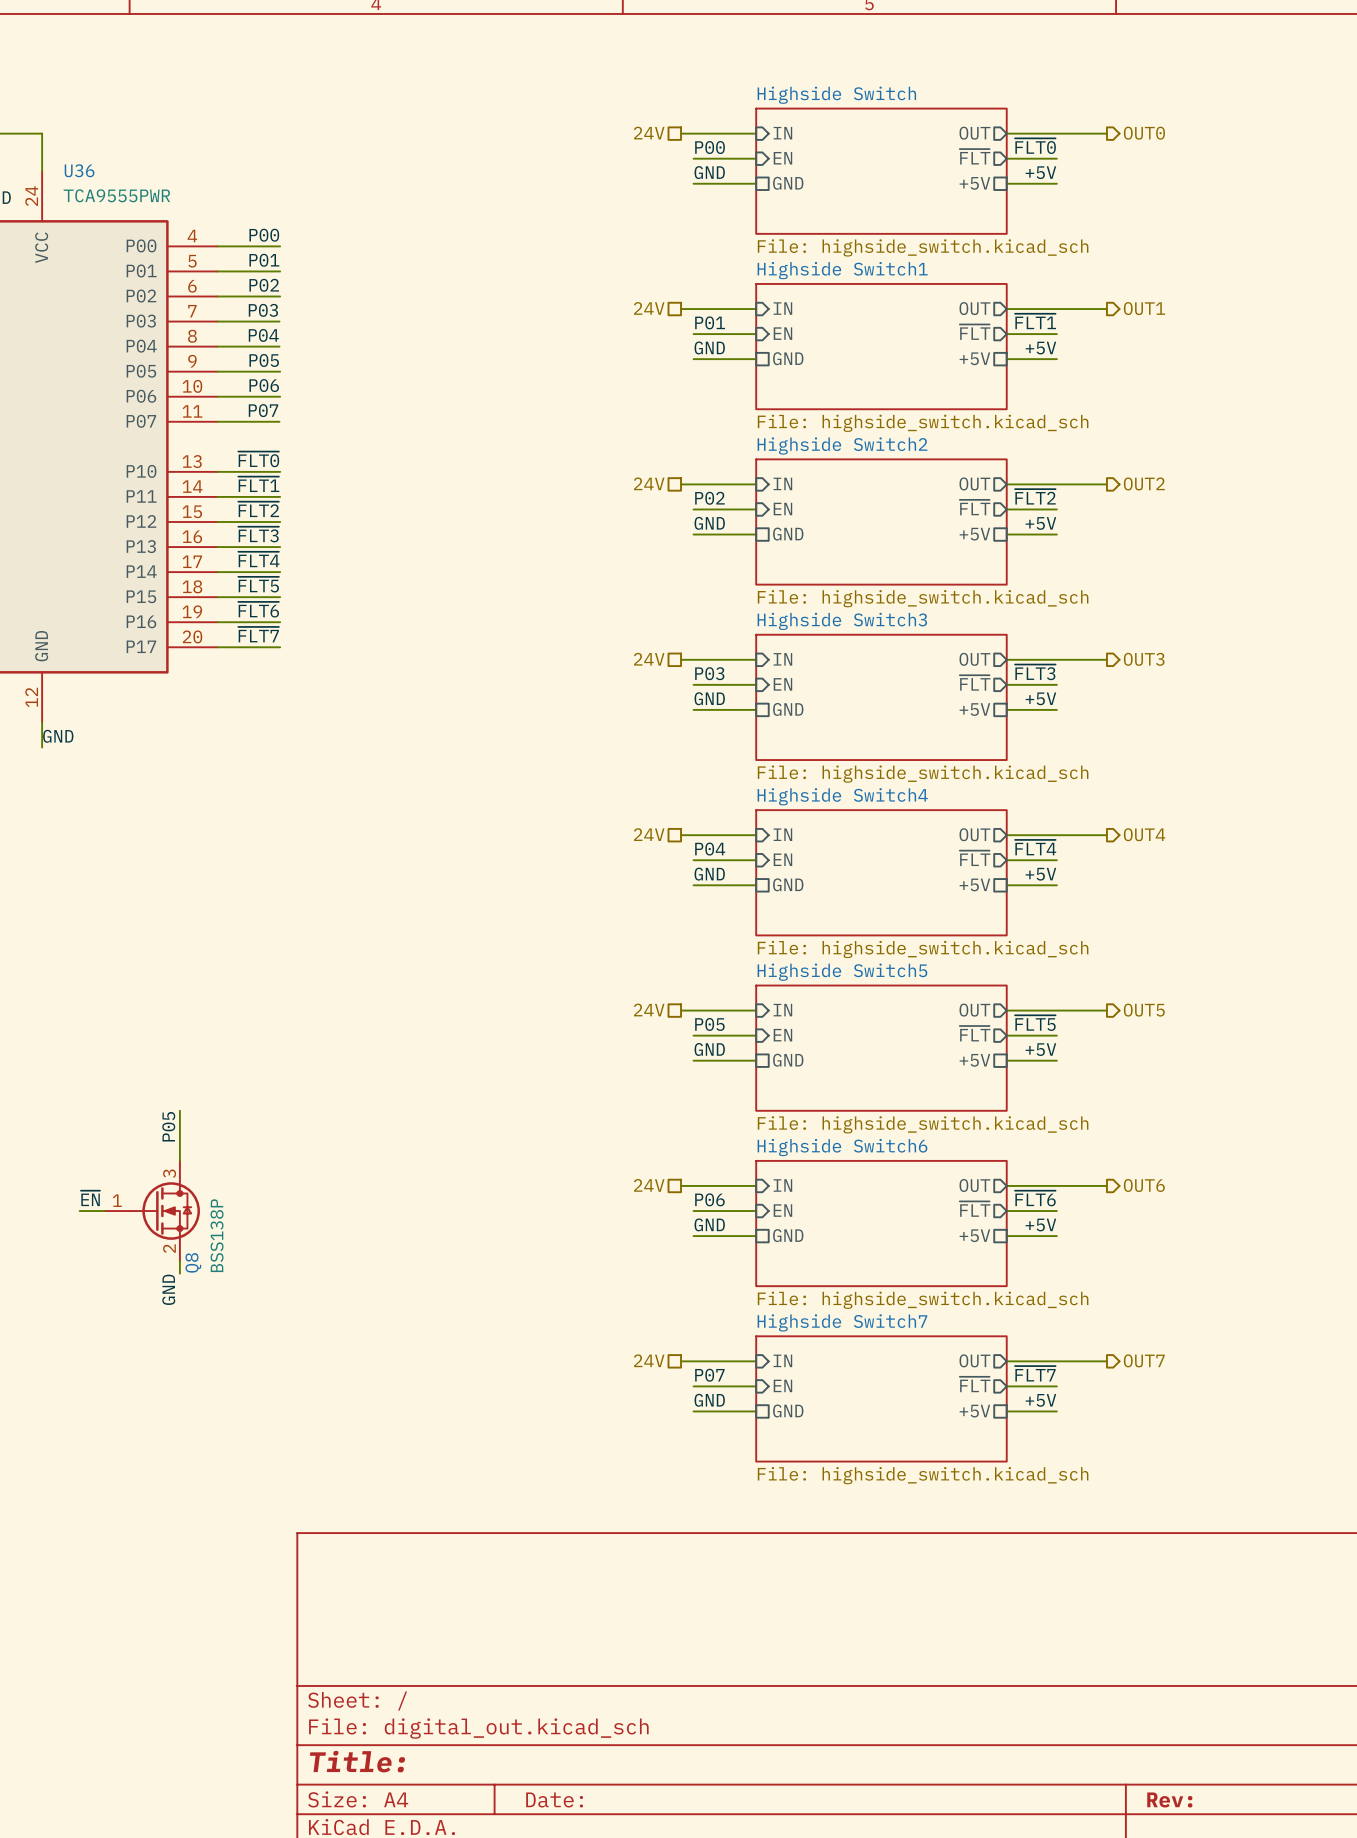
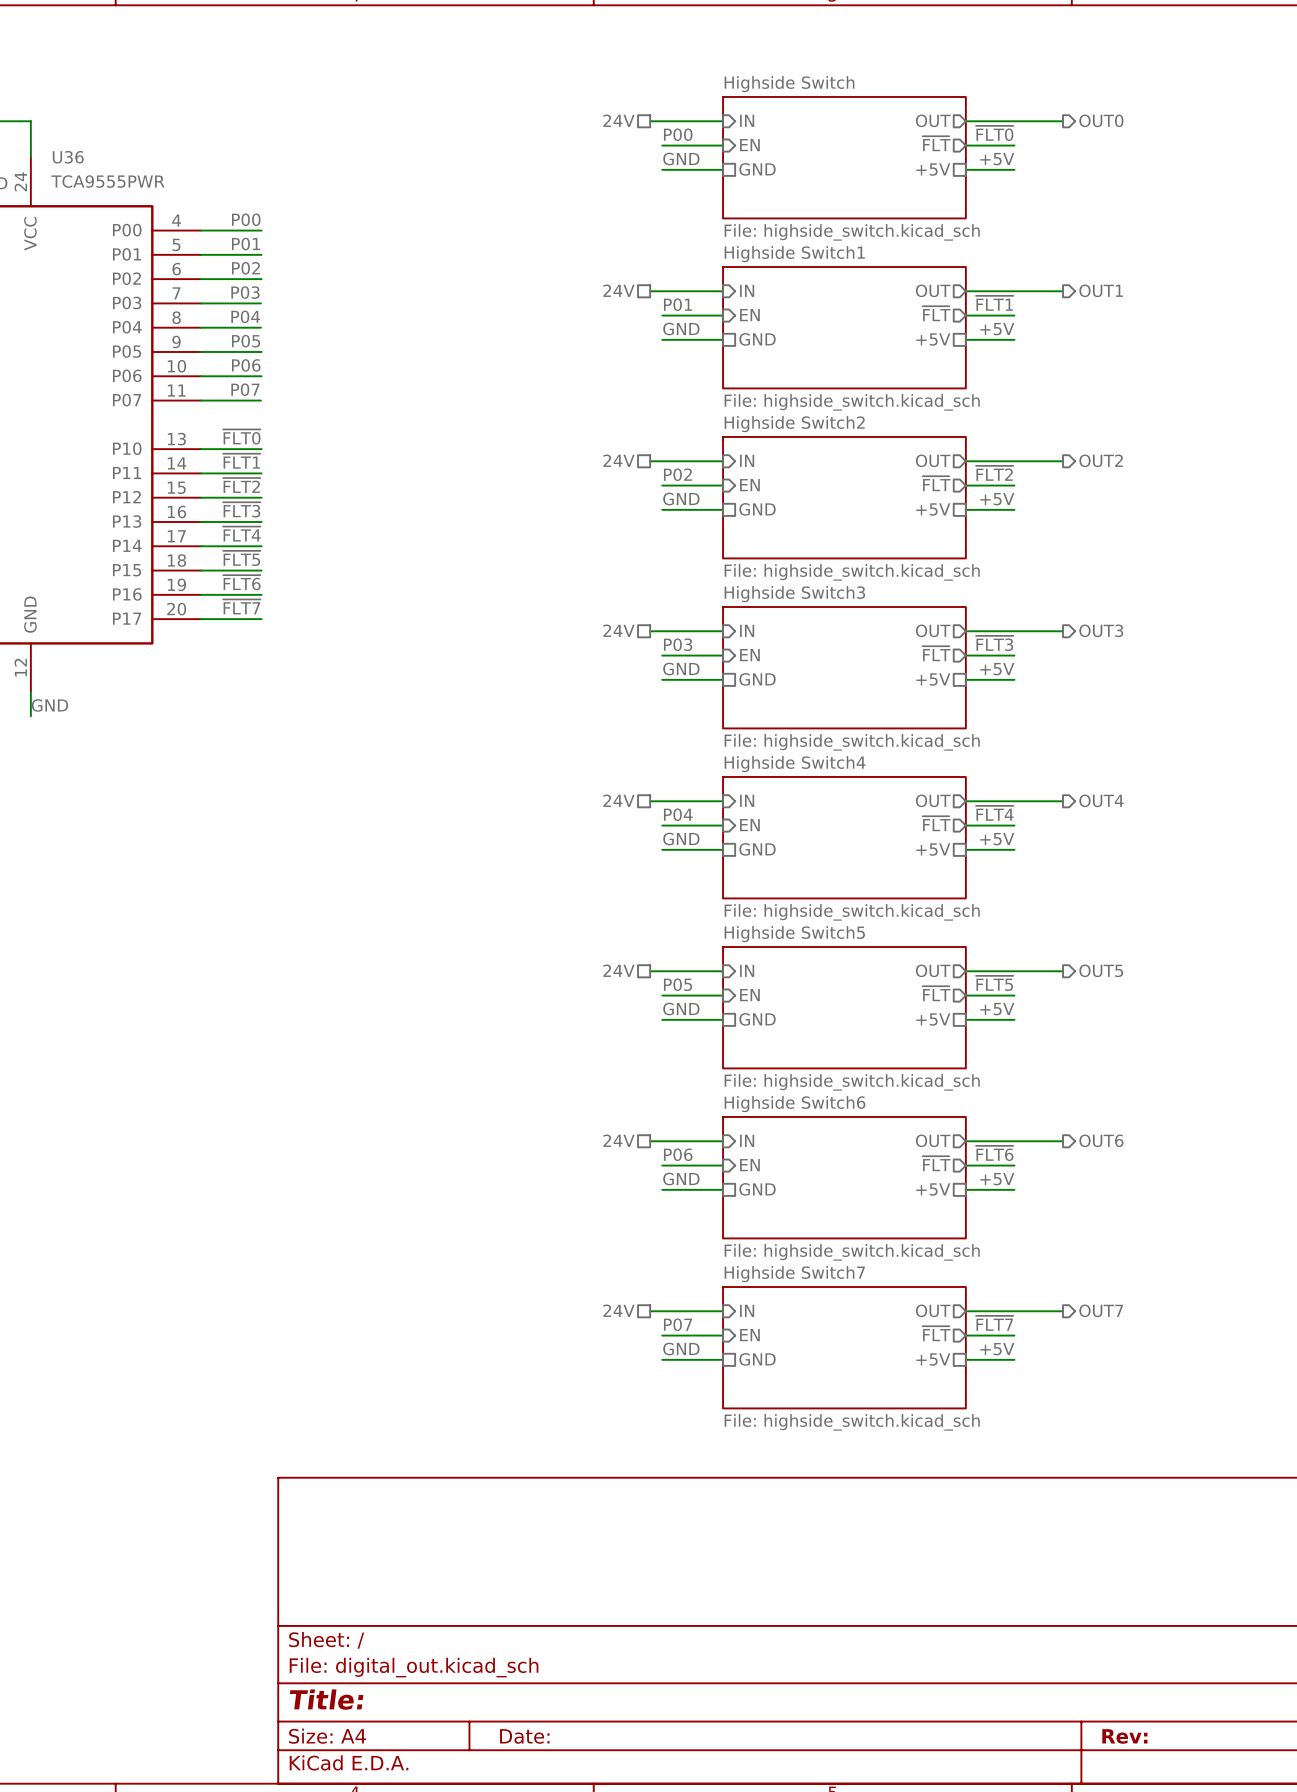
wire: (179, 1110) (179, 1160) -> none
label: P05 (168, 1126) -> none
label: ~{EN} (90, 1198) -> none
wire: (79, 1211) (104, 1211) -> none
Q8: BSS138P (152, 1211) -> none
wire: (179, 1261) (179, 1273) -> none
label: GND (168, 1289) -> none

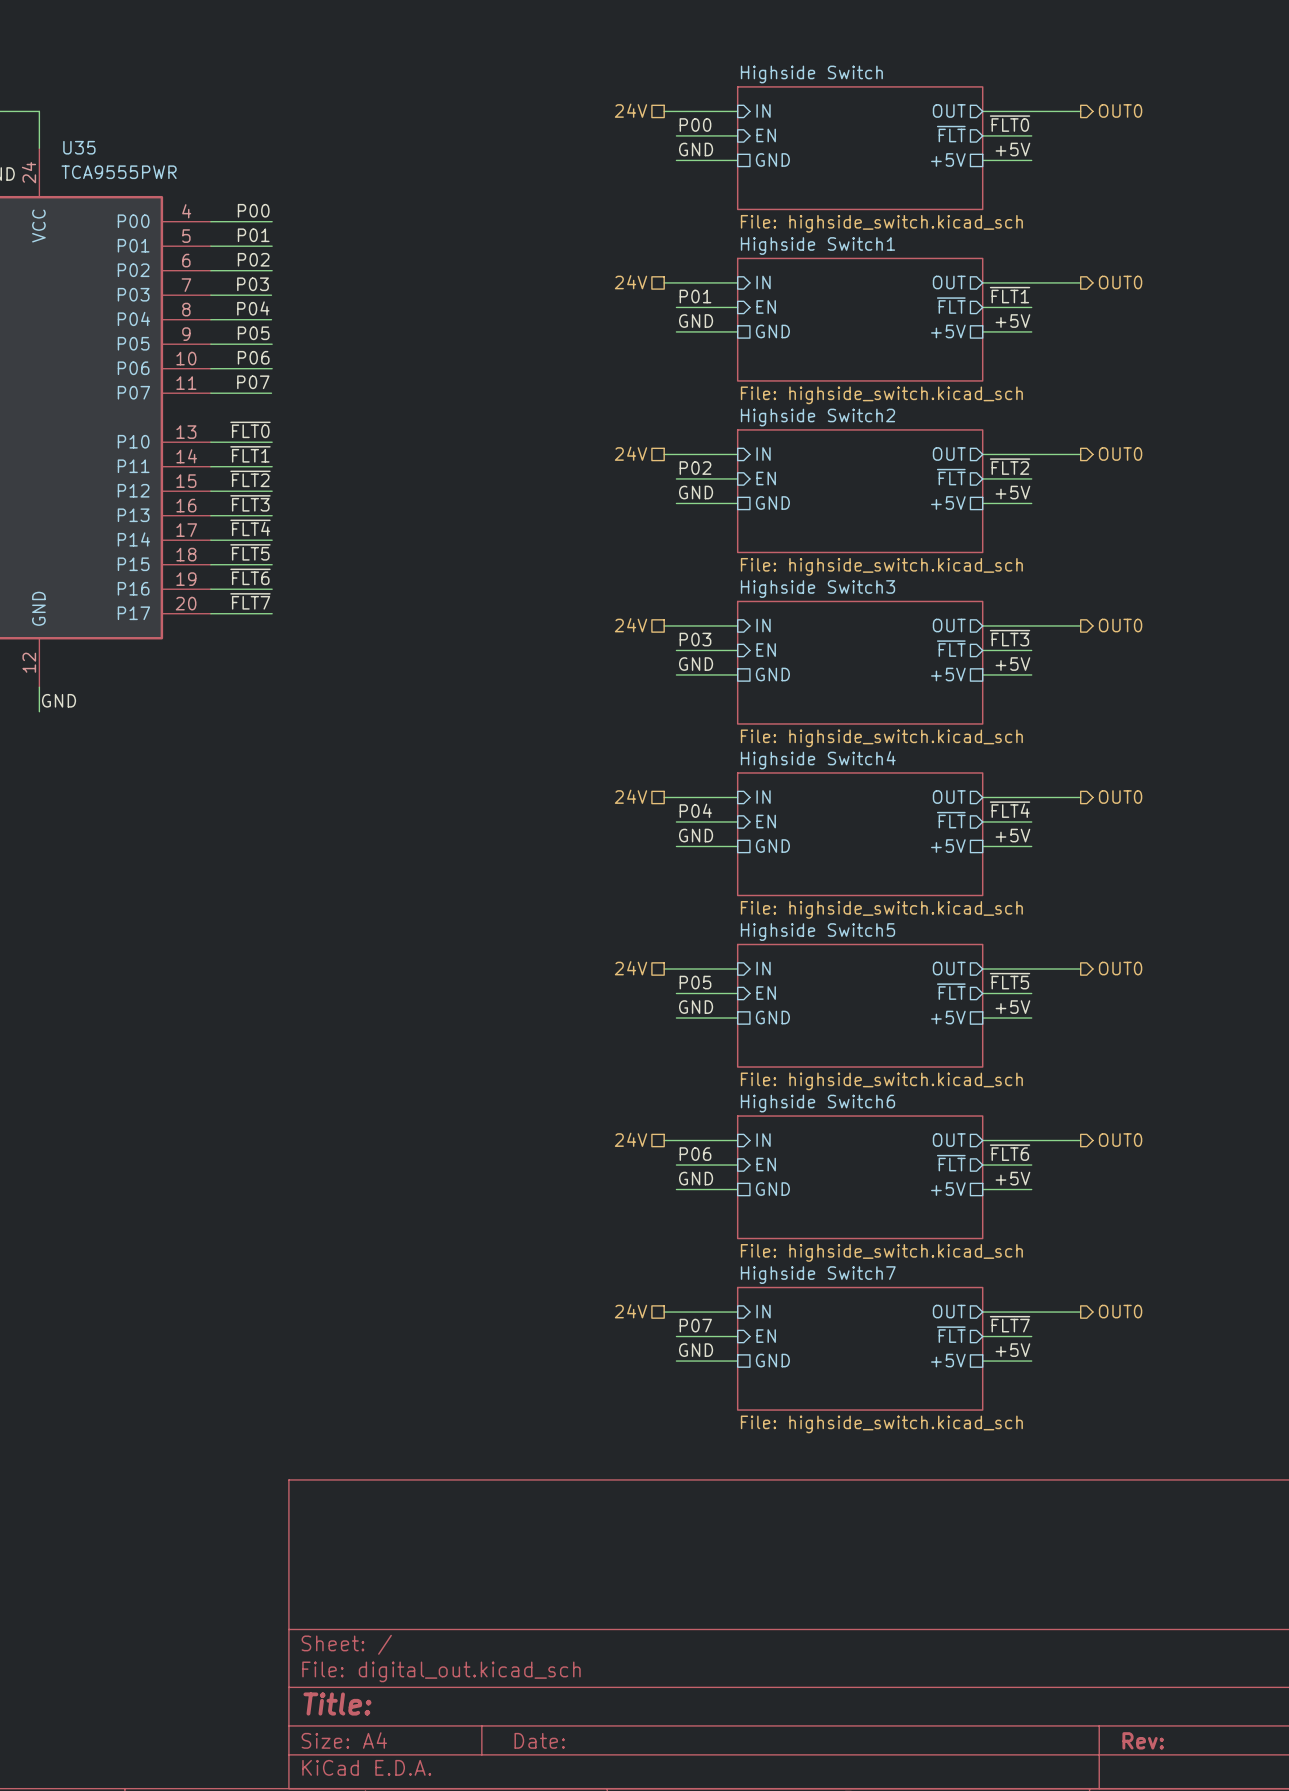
U36 name: U36 (68, 157) -> U35 (79, 147)
hierarchical label: OUT1 (1101, 290) -> OUT0 (1120, 282)
hierarchical label: OUT2 (1101, 460) -> OUT0 (1120, 454)
hierarchical label: OUT3 (1101, 630) -> OUT0 (1120, 625)
hierarchical label: OUT4 (1101, 800) -> OUT0 (1120, 797)
hierarchical label: OUT5 (1101, 970) -> OUT0 (1120, 968)
hierarchical label: OUT6 (1101, 1140) -> OUT0 (1120, 1140)
hierarchical label: OUT7 (1101, 1310) -> OUT0 (1120, 1311)

